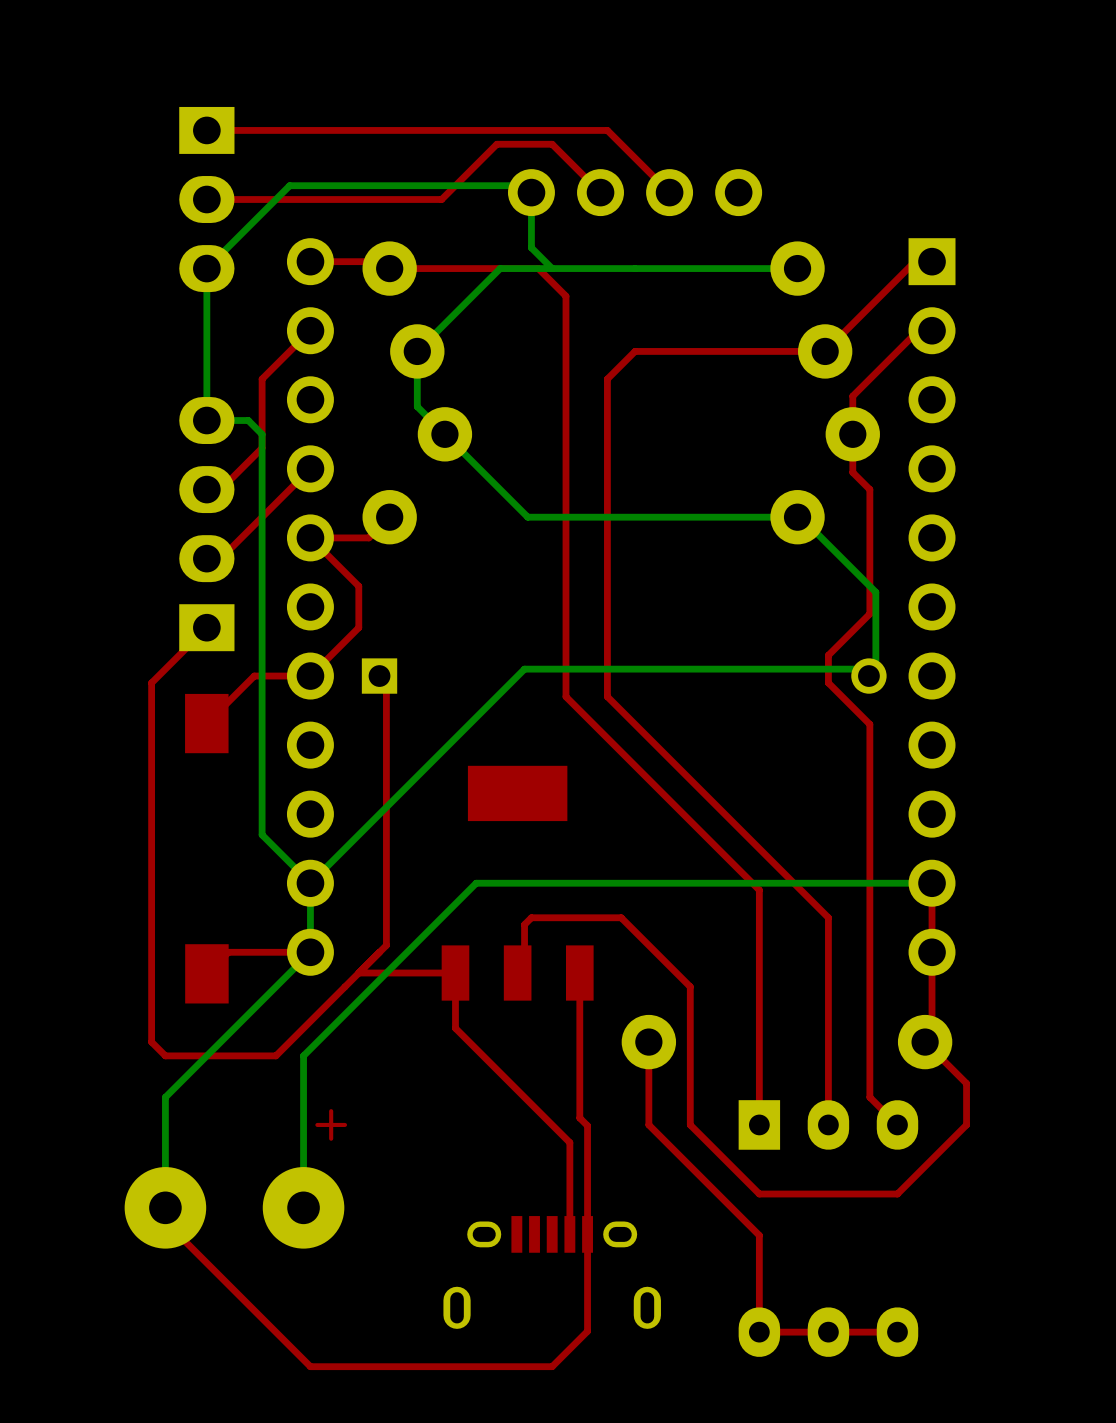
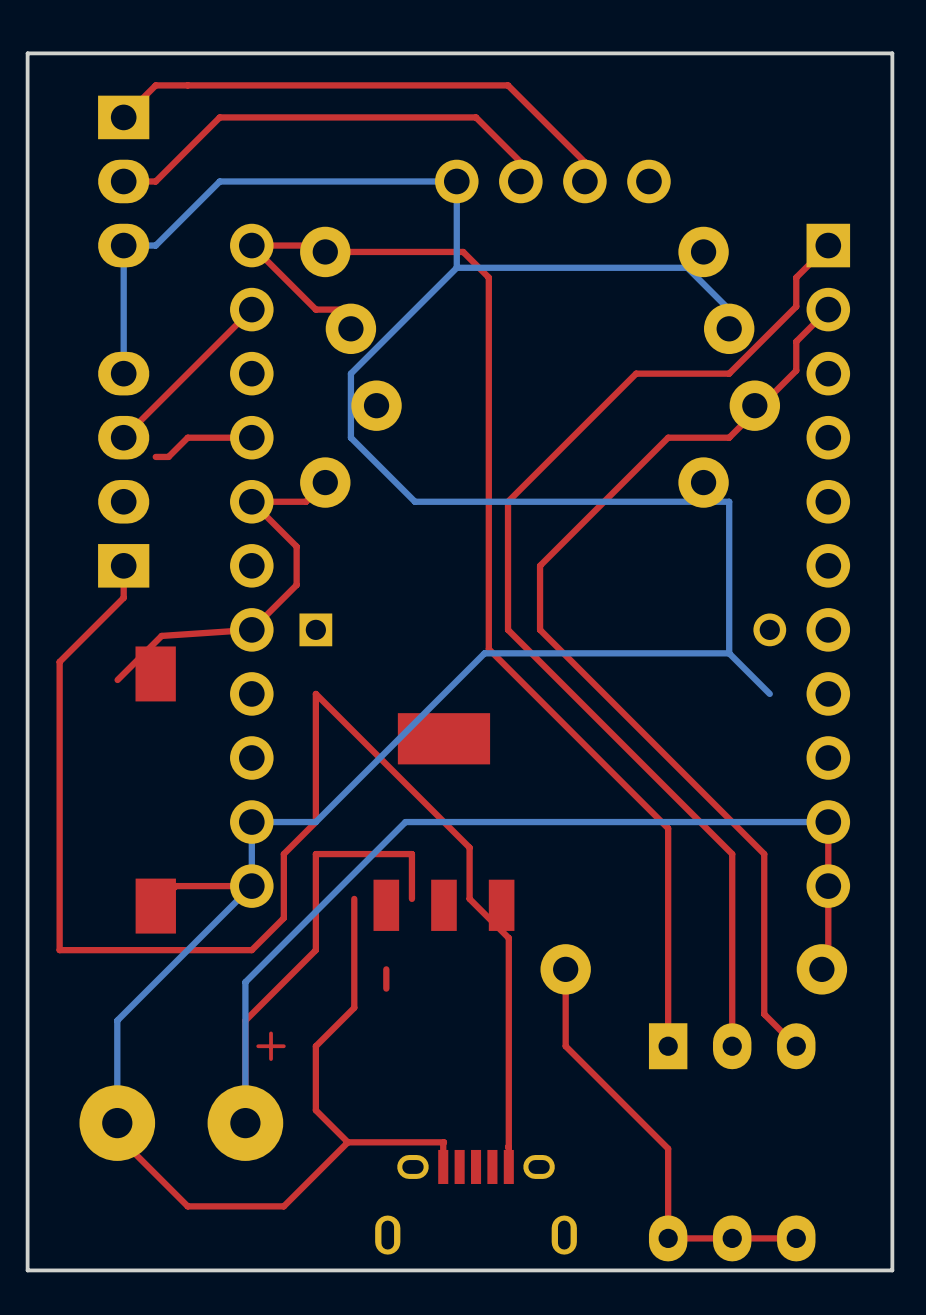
board edge: none -> (892, 53) (27, 53) (27, 1270) (892, 1270) (892, 53)
top track: (206, 130) (607, 130) (669, 192) -> (123, 117) (155, 85) (508, 85) (584, 162) (584, 181)
bottom track: (524, 185) (289, 185) (206, 268) (206, 420) (248, 420) (262, 434) (262, 834) (310, 883) (524, 669) (875, 669) (875, 592) (800, 517) (527, 517) (417, 406) -> (729, 653) (729, 501) (414, 501) (350, 437) (350, 380)
bottom track: none -> (456, 181) (219, 181) (155, 245) (123, 245) (123, 373)
top track: (600, 192) (552, 144) (496, 144) (441, 199) (206, 199) -> (520, 181) (520, 162) (476, 117) (219, 117) (155, 181) (123, 181)
part position: (206, 199) -> (123, 181)
bottom track: (531, 247) (552, 268) -> (456, 232) (456, 267)
top track: none -> (251, 245) (315, 309) (350, 309)
top track: (914, 261) (825, 351) (635, 351) (607, 379) (607, 696) -> (828, 245) (796, 277) (796, 306) (729, 373) (636, 373) (508, 501) (508, 629) (527, 649)
bottom track: (797, 268) (500, 268) (417, 351) (417, 399) -> (456, 267) (350, 373)
bottom track: none -> (456, 267) (687, 267) (729, 309)
top track: (918, 330) (852, 396) (852, 472) (869, 489) (869, 613) (828, 655) (828, 682) (869, 724) (869, 1097) -> (828, 309) (796, 341) (796, 370) (729, 437) (668, 437) (540, 565) (540, 629) (764, 854) (764, 1014) (770, 1020)
top track: (262, 379) (262, 448) (241, 468) -> (206, 354) (123, 437)
top track: (310, 468) (220, 558) (206, 558) -> (251, 437) (187, 437)
part position: (206, 524) -> (123, 469)
top track: (206, 627) (151, 682) (151, 1042) (165, 1055) (275, 1055) (310, 1021) -> (123, 565) (123, 597) (59, 661) (59, 950) (251, 950)
top track: (393, 669) (386, 669) (386, 945) (344, 986) -> none
top track: (310, 676) (254, 676) (206, 723) -> (251, 629) (161, 635) (117, 680)
bottom track: none -> (729, 653) (484, 653) (315, 822) (251, 822)
bottom track: none -> (729, 653) (769, 693)
top track: none -> (354, 898) (354, 1007) (315, 1046) (315, 1110) (347, 1142)
top track: none -> (411, 898) (411, 854) (315, 854) (315, 950) (245, 1020) (245, 1123)
top track: (358, 973) (455, 973) (455, 1028) (569, 1142) (569, 1234) -> none
top track: (579, 973) (579, 1118) (587, 1125) -> (283, 918) (283, 854) (315, 822) (315, 693) (469, 847) (469, 898) (508, 938) (508, 1047)
top track: (524, 993) (524, 924) (531, 917) (621, 917) (690, 986) (690, 1124) (759, 1194) (897, 1194) (966, 1124) (966, 1083) (932, 1048) -> none
top track: none -> (386, 969) (386, 988)
top track: none -> (347, 1142) (443, 1142) (443, 1166)
top track: (587, 1255) (587, 1331) (552, 1366) (310, 1366) (241, 1297) -> (347, 1142) (283, 1206) (187, 1206)
part position: (552, 1272) -> (476, 1202)

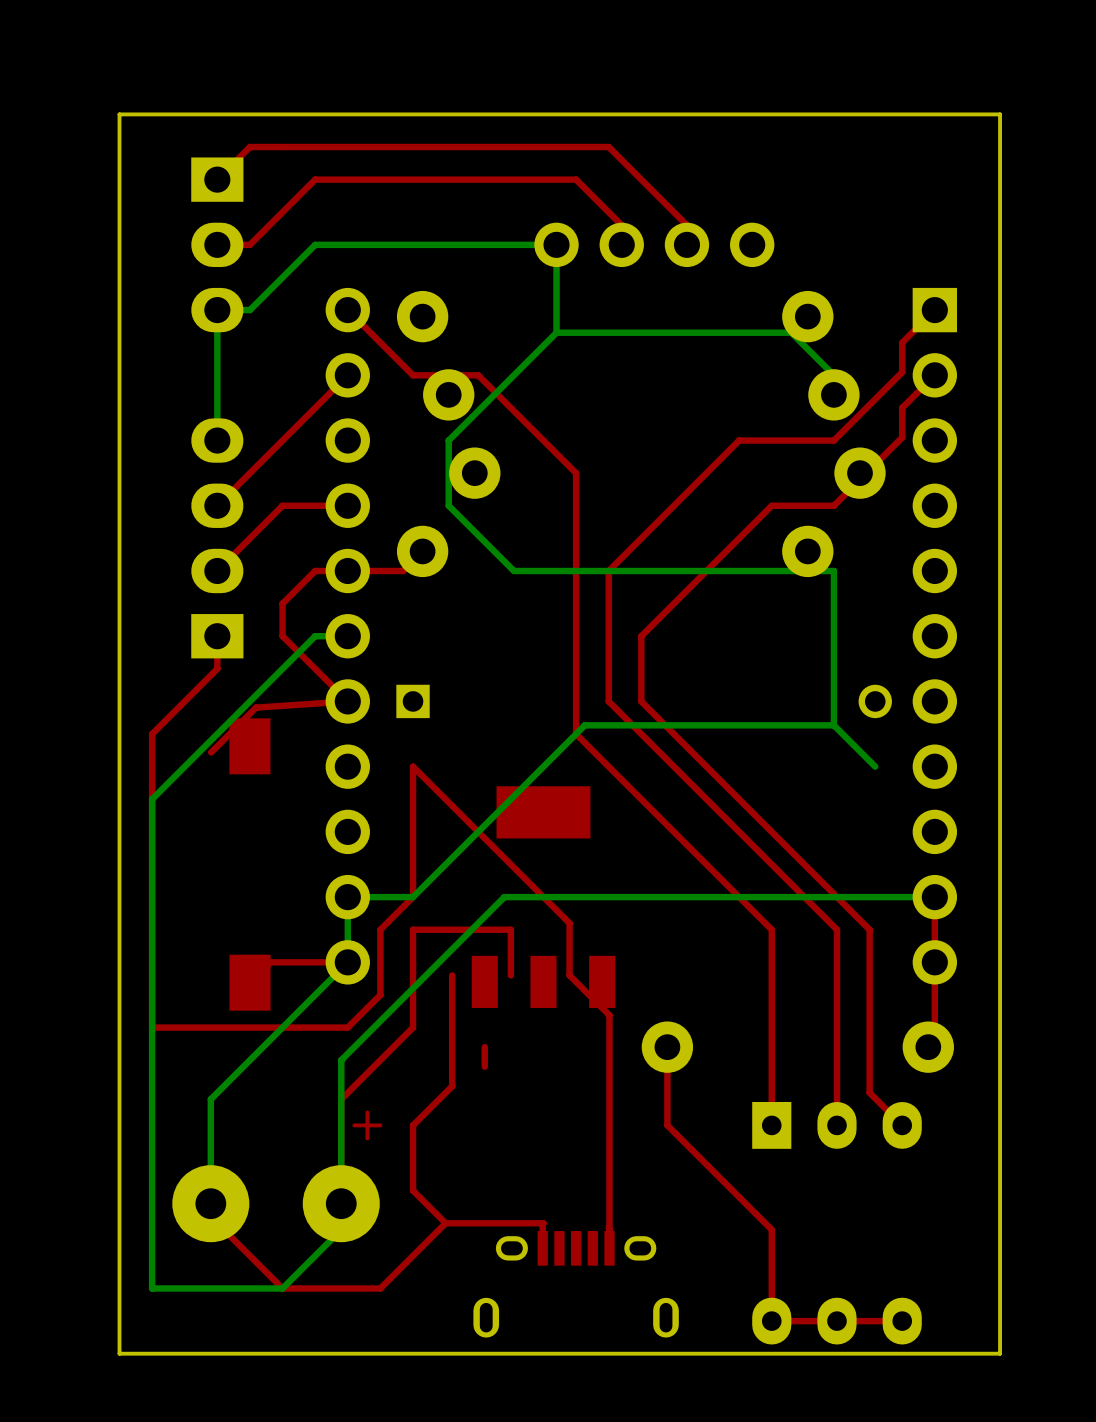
top track: (251, 245) (318, 245) (325, 251) (463, 251) (488, 277) (488, 649) (668, 828) (668, 854) -> (448, 375) (478, 375) (576, 473) (576, 734) (771, 929)
top track: (168, 456) (155, 456) -> (263, 525) (217, 570)
top track: (251, 501) (296, 546) (296, 585) (251, 629) -> (347, 570) (315, 570) (282, 603) (282, 636) (347, 701)
bottom track: none -> (347, 636) (315, 636) (152, 799) (152, 1288) (282, 1288) (341, 1229) (341, 1203)

